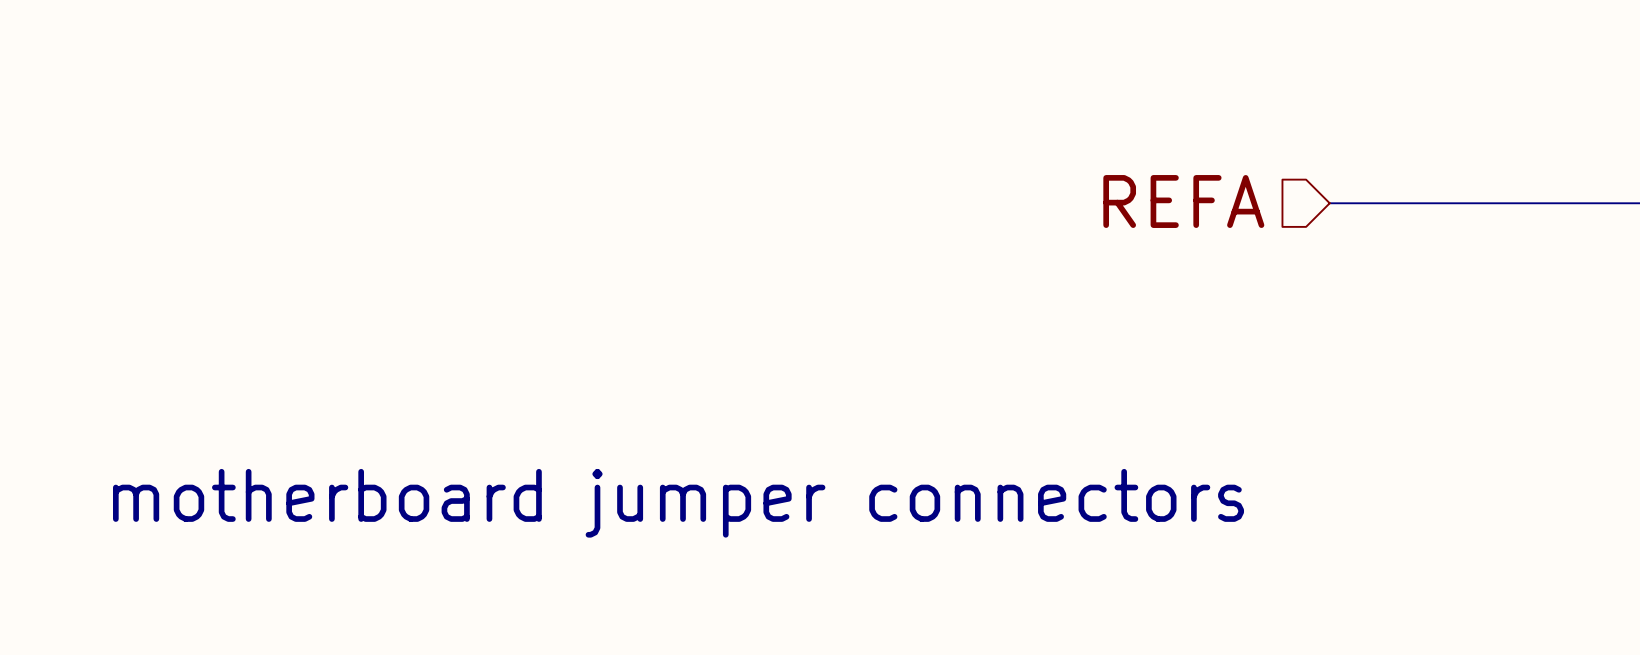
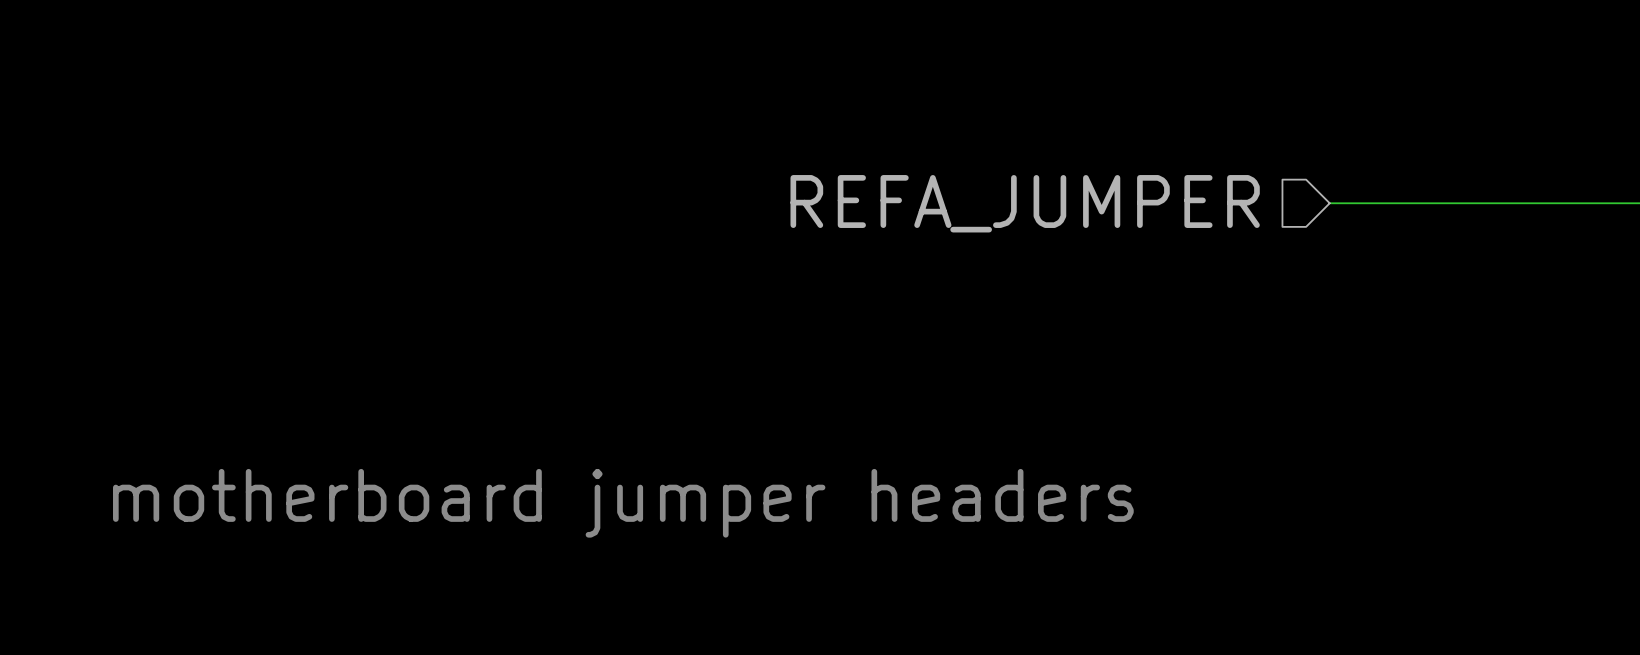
hierarchical label: REFA (1183, 201) -> REFA_JUMPER (1025, 203)
text: motherboard jumper connectors (678, 503) -> motherboard jumper headers (623, 503)

